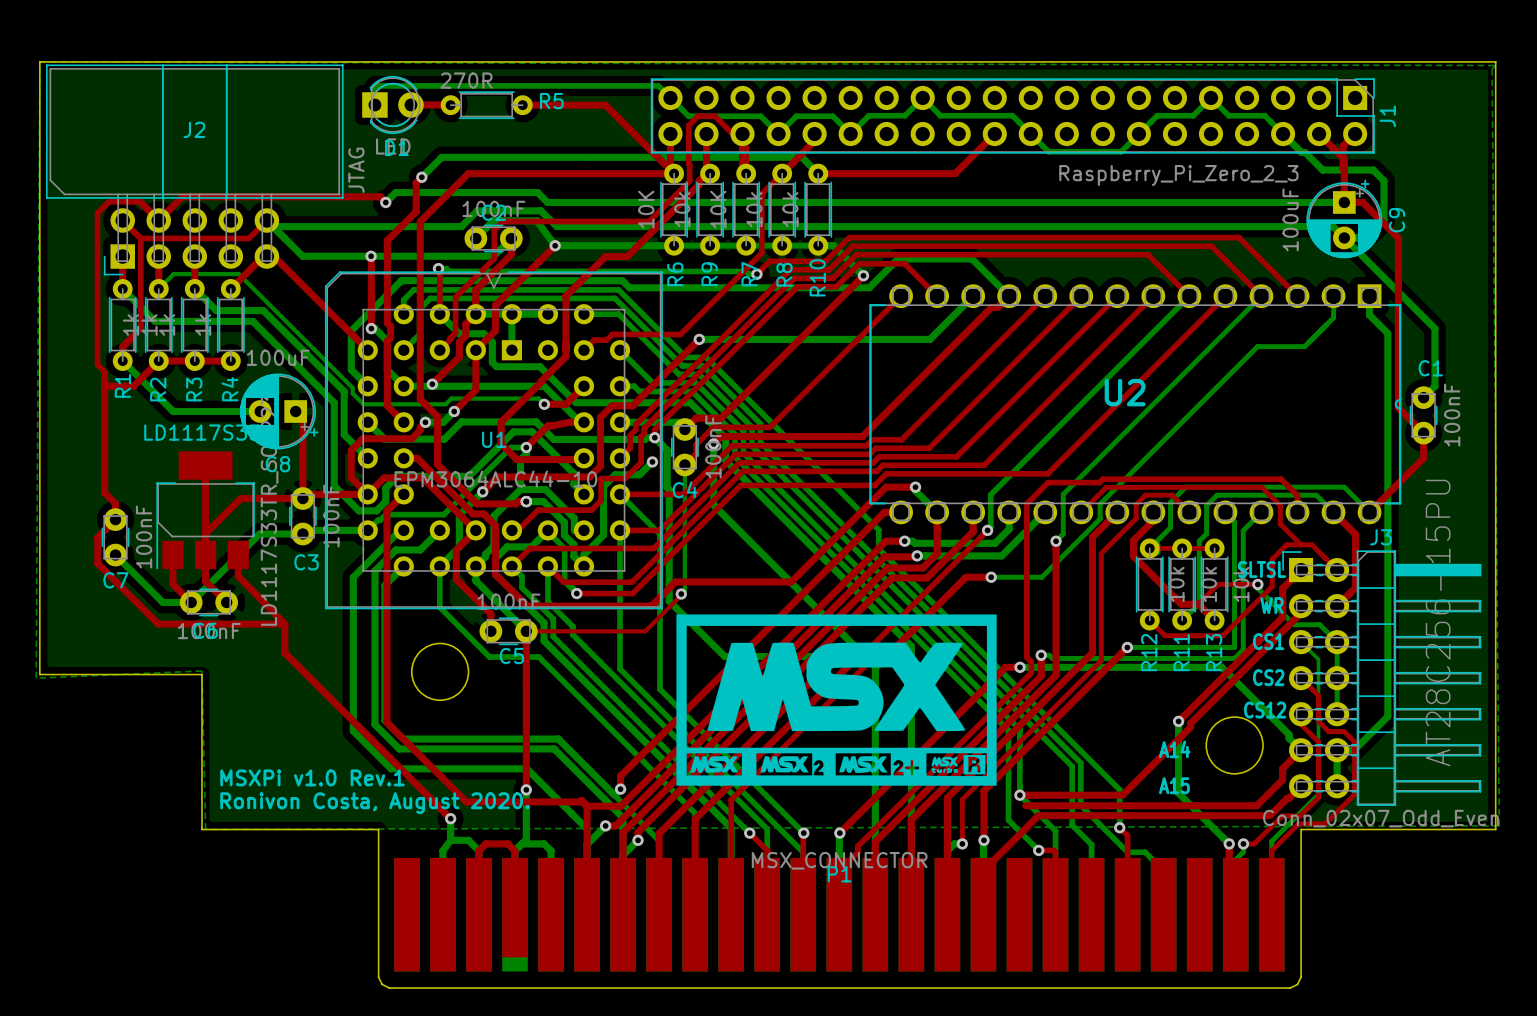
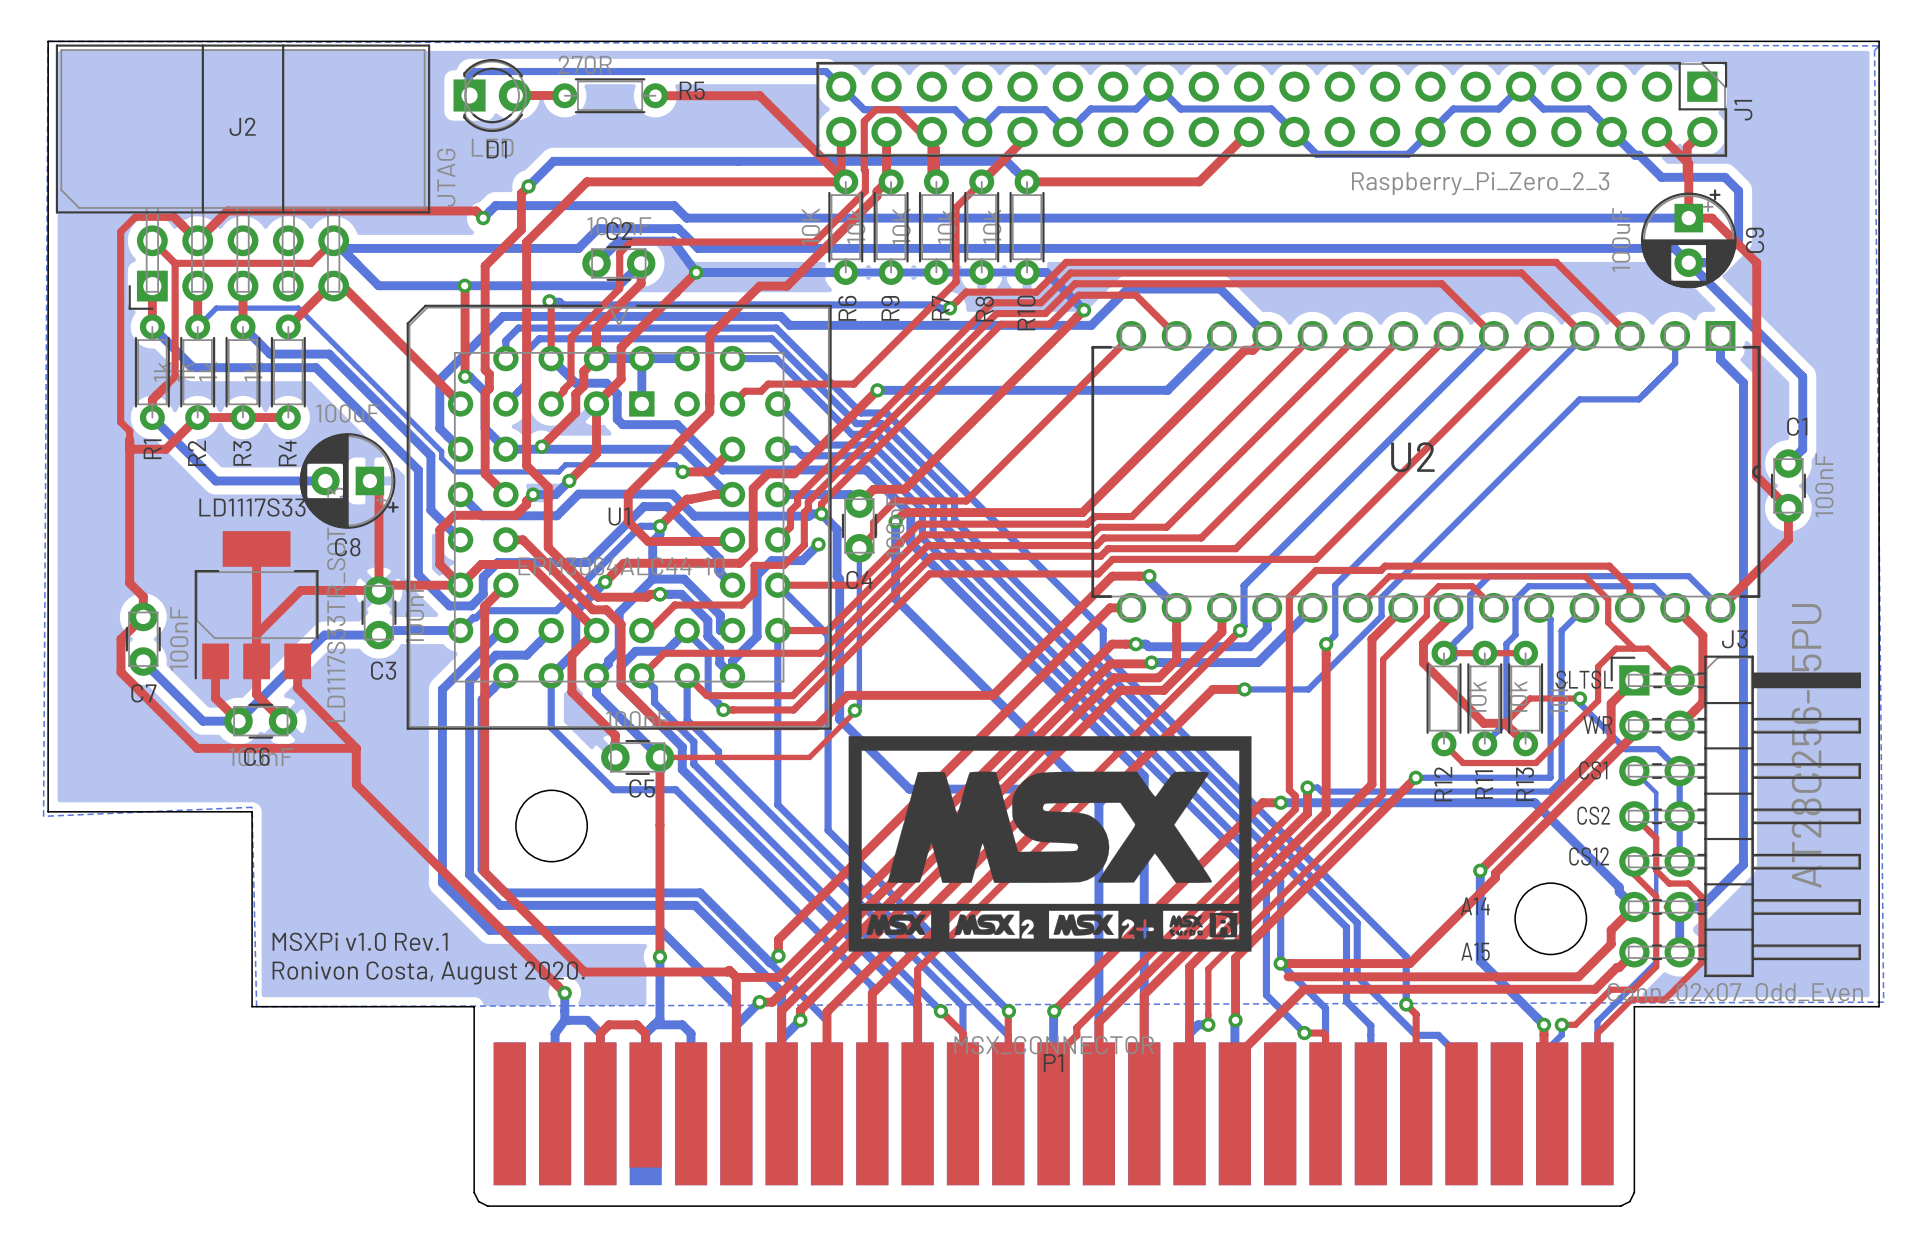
P1 footprint: [394, 643, 1285, 972] -> [493, 790, 1614, 1186]

